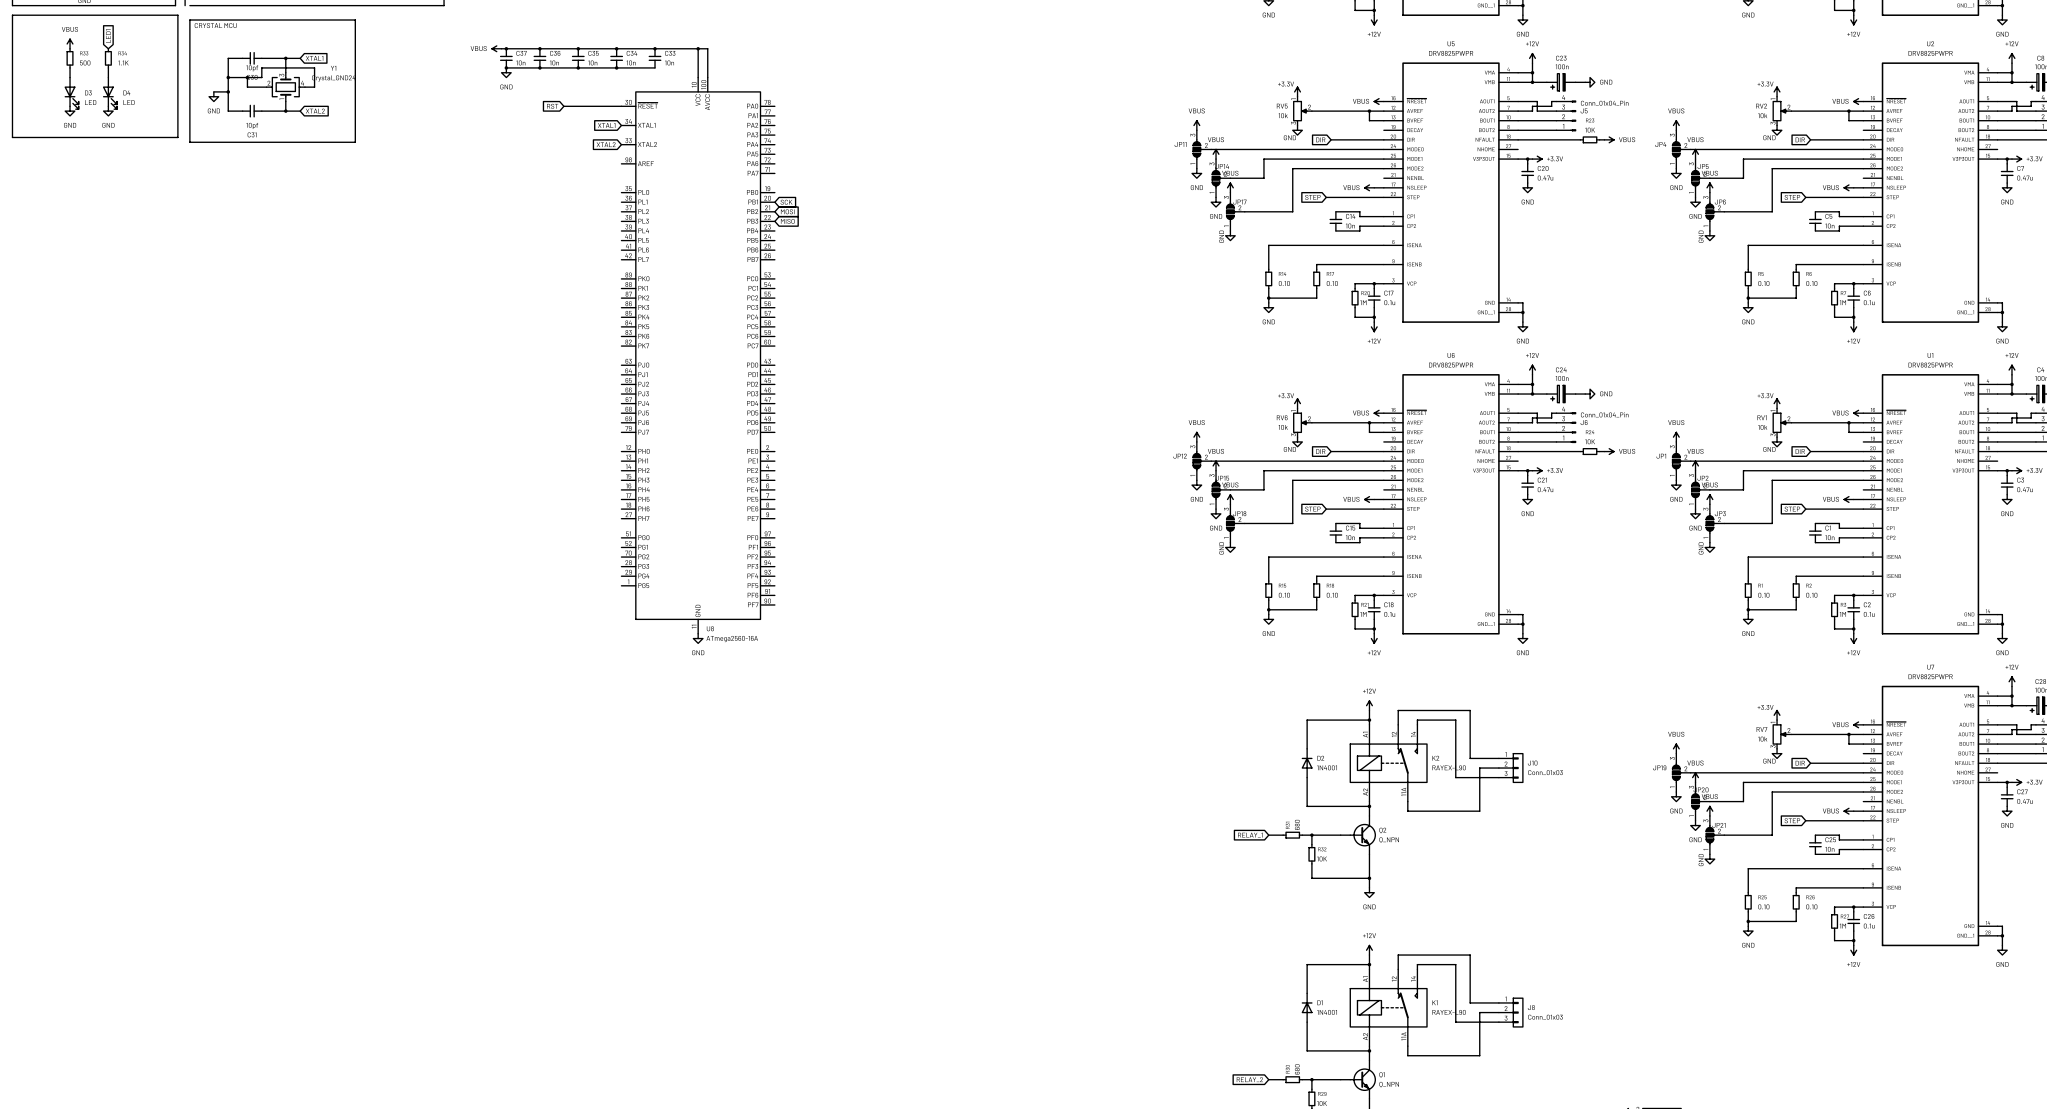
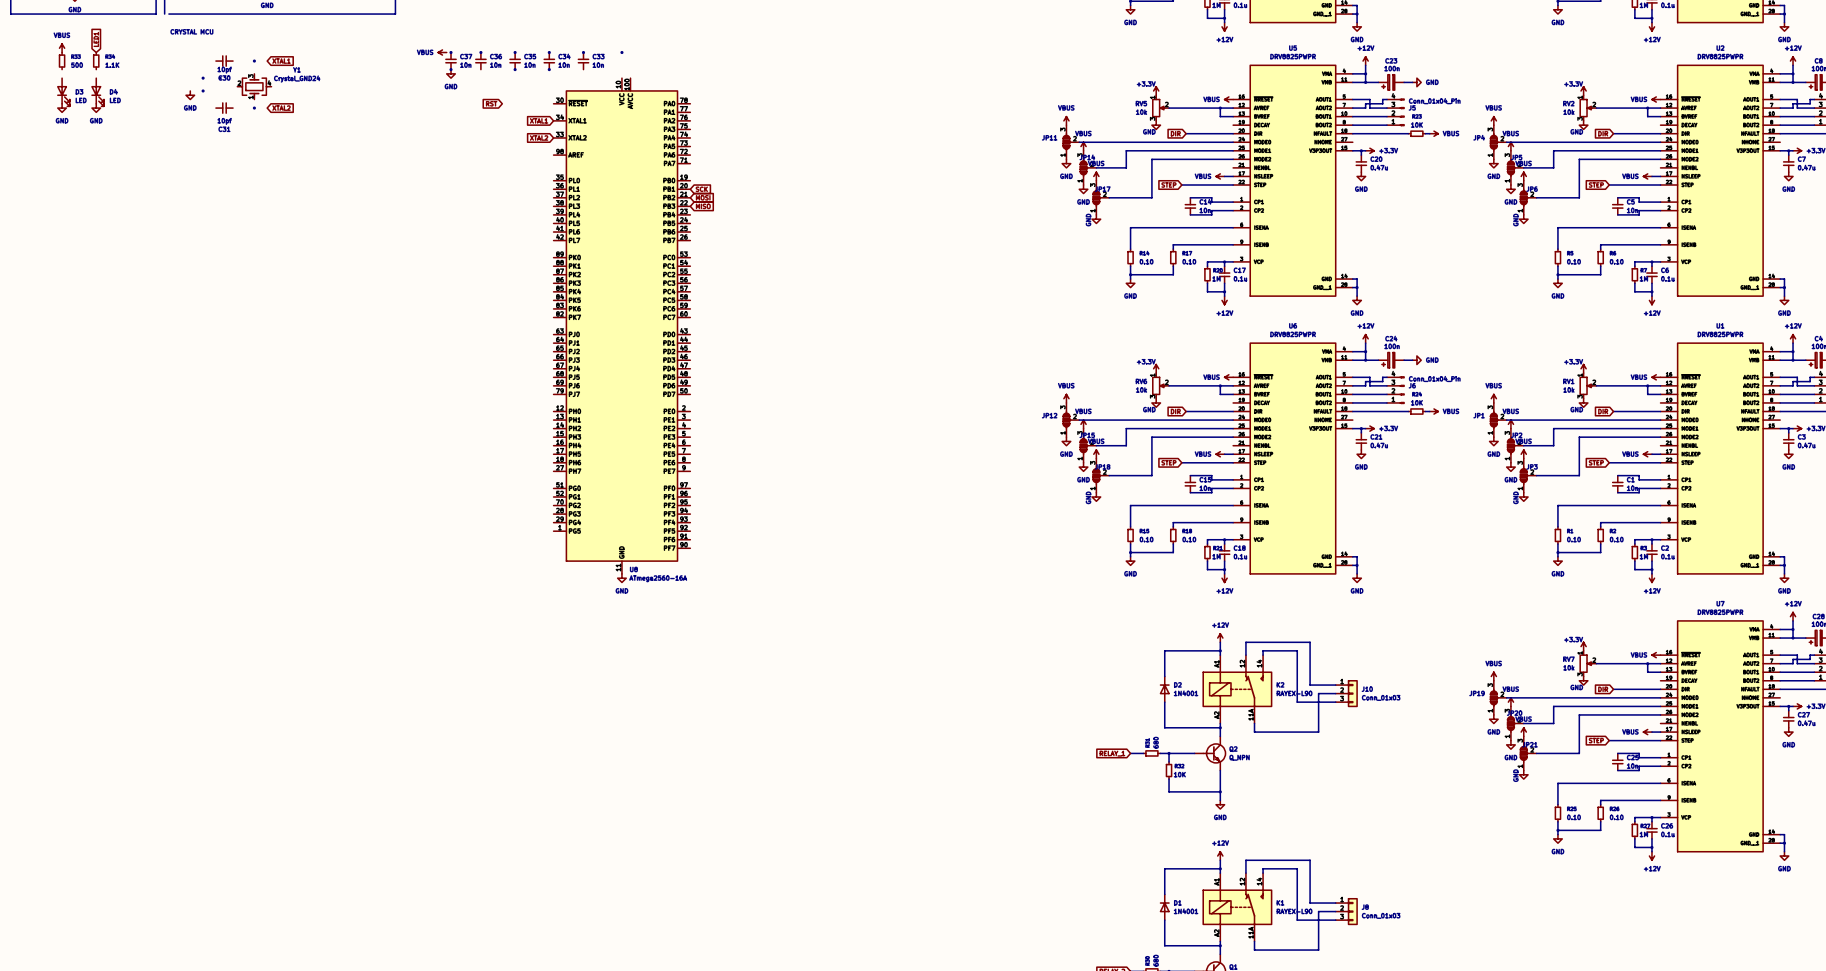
line: (12, 15) (12, 137) (177, 137) (177, 15) (12, 15) -> none
line: (189, 20) (355, 20) (355, 142) (189, 142) (189, 20) -> none
wire: (501, 48) (707, 48) (707, 77) -> none
wire: (698, 48) (698, 77) -> none
wire: (242, 58) (228, 58) (228, 111) (242, 111) -> none
wire: (261, 58) (300, 58) -> none
wire: (285, 58) (285, 72) -> none
wire: (70, 67) (70, 77) -> none
wire: (108, 67) (108, 77) -> none
wire: (506, 67) (655, 67) -> none
junction: (539, 67) -> none
wire: (228, 77) (261, 77) (261, 67) (314, 67) (314, 87) (304, 87) -> none
wire: (247, 77) (247, 87) (266, 87) -> none
wire: (213, 91) (228, 91) -> none
wire: (285, 101) (285, 111) -> none
wire: (563, 106) (621, 106) -> none
wire: (261, 111) (300, 111) -> none

